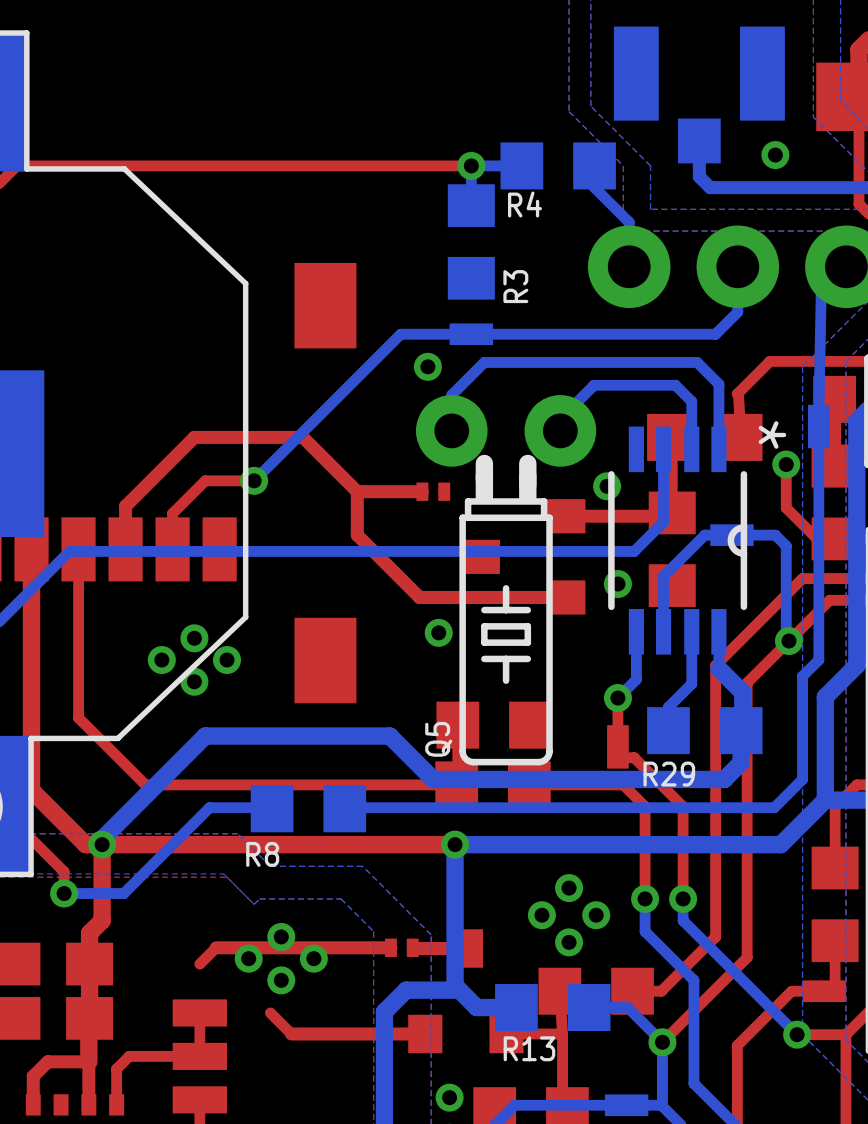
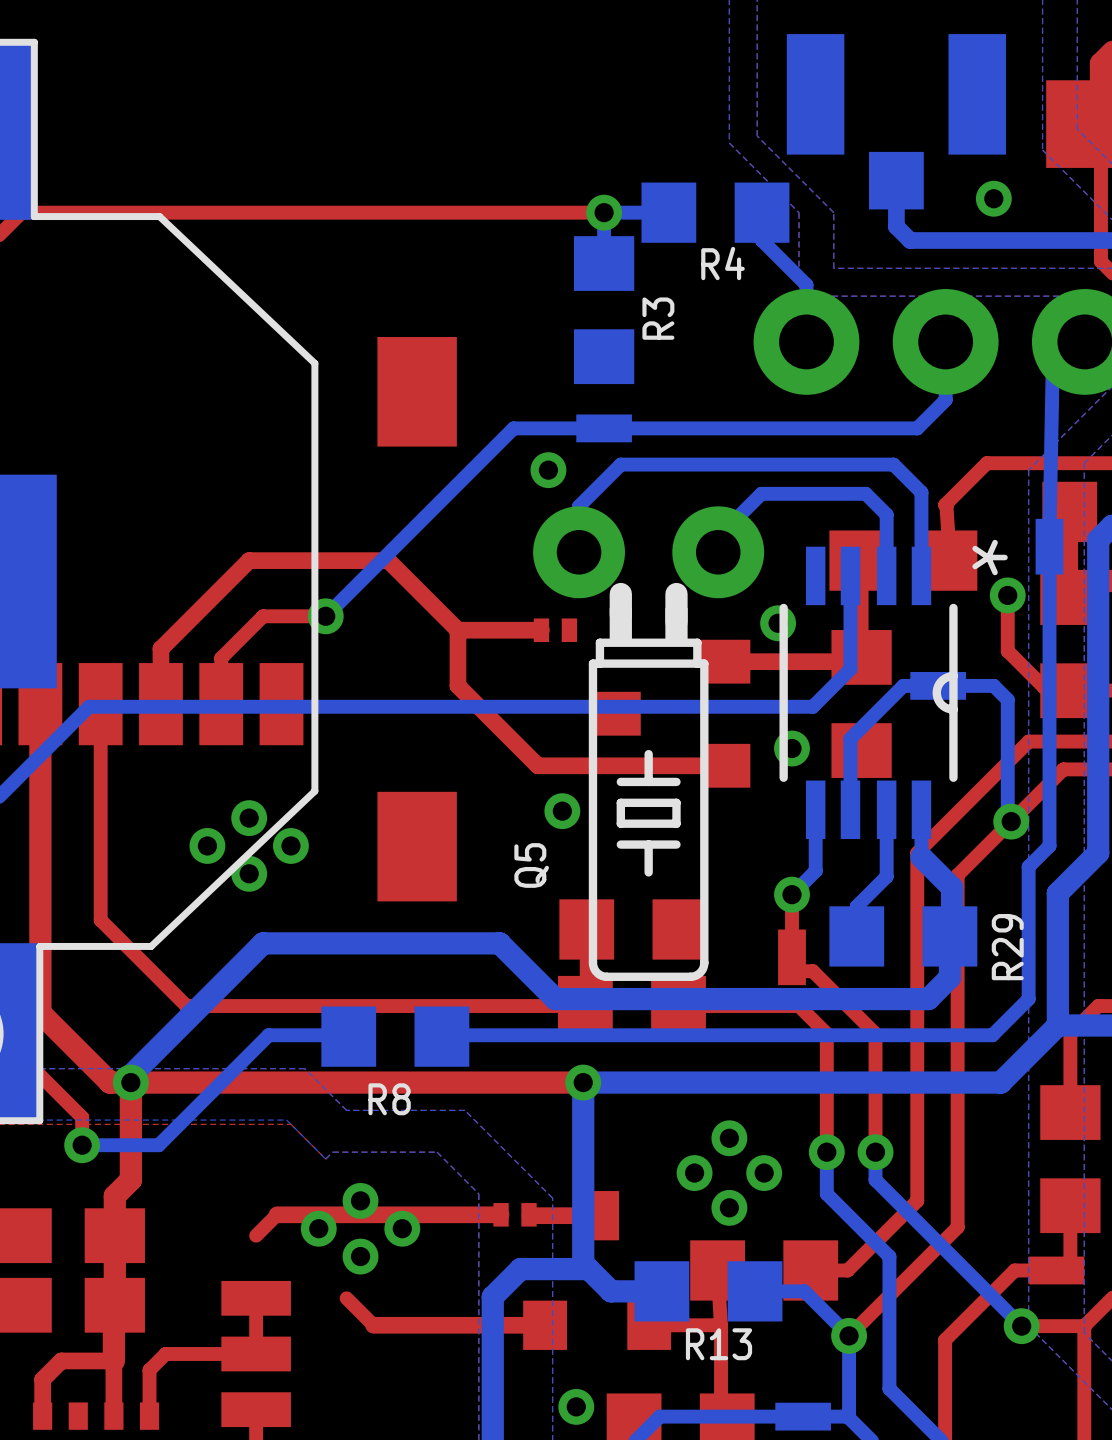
R4 name position: R4 (524, 204) -> R4 (722, 263)
R3 name position: R3 (515, 286) -> R3 (658, 318)
Q5 name position: Q5 (438, 739) -> Q5 (531, 865)
R29 name rotation: 0° (669, 774) -> 90° counterclockwise (1007, 947)
R29 name position: R29 (669, 774) -> R29 (1007, 947)
R8 name position: R8 (262, 854) -> R8 (389, 1099)
R13 name position: R13 (529, 1048) -> R13 (719, 1344)

